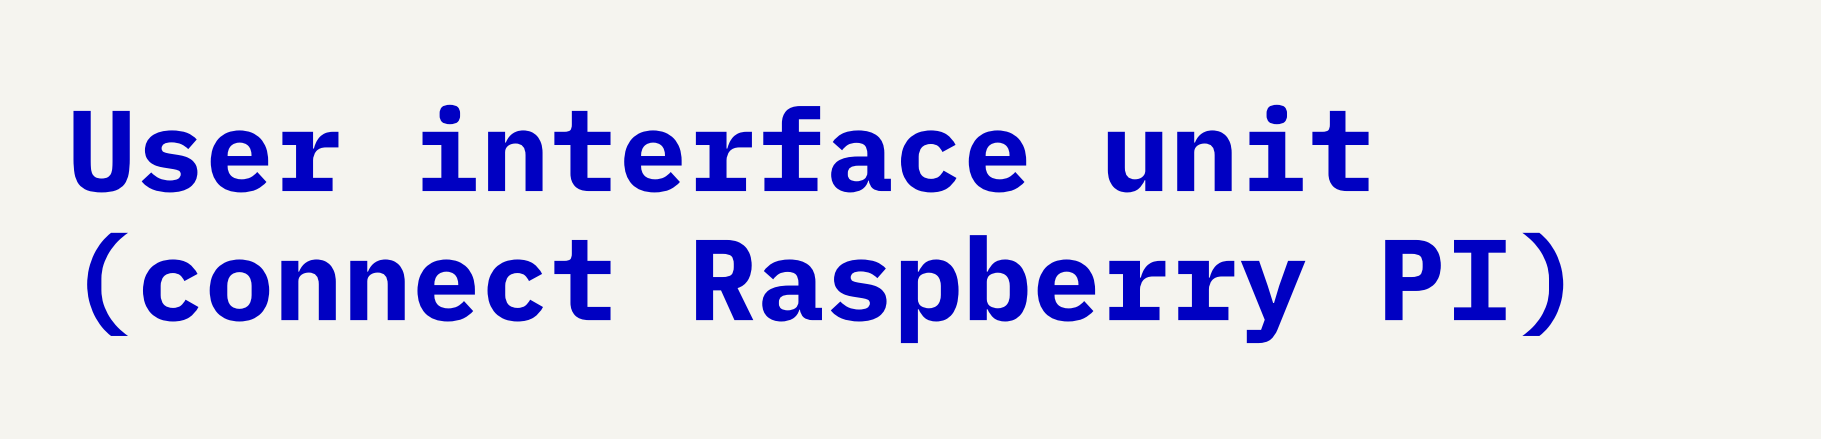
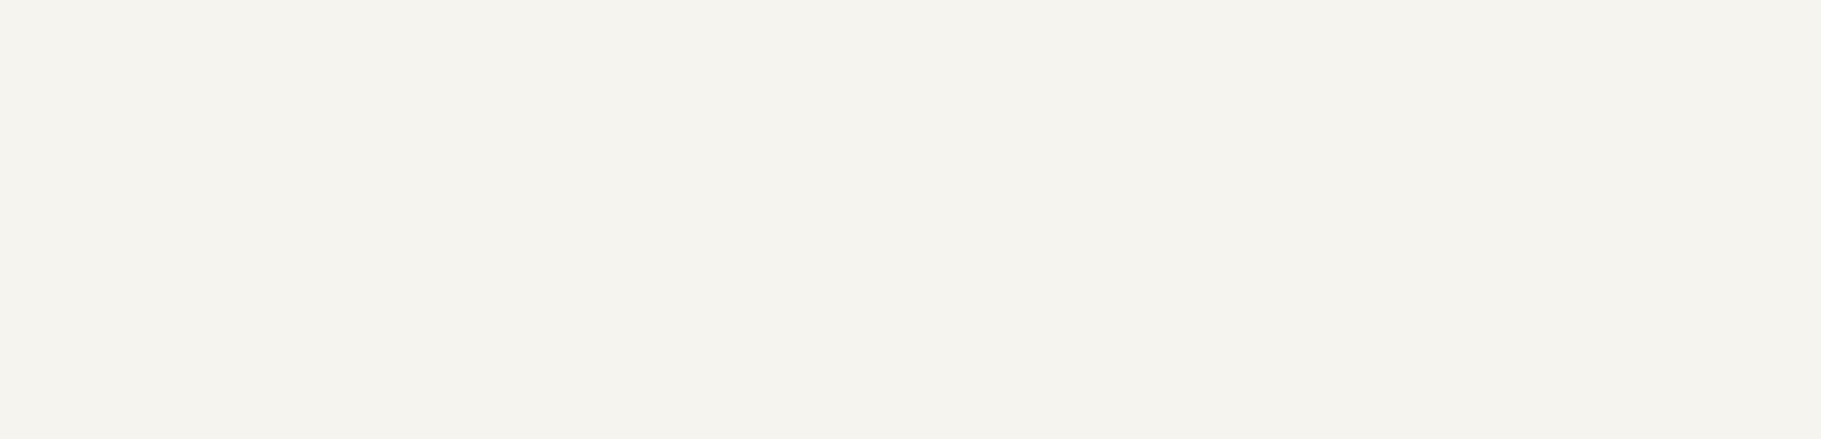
text: User interface unit (721, 148) -> none
text: (connect Raspberry PI) (825, 287) -> none

